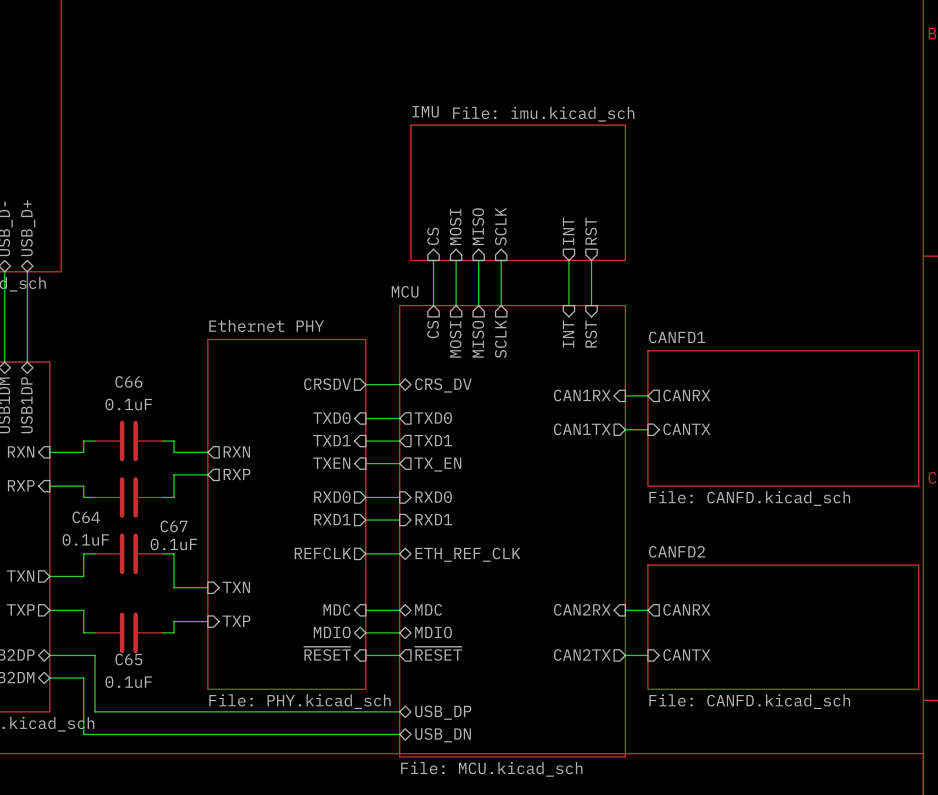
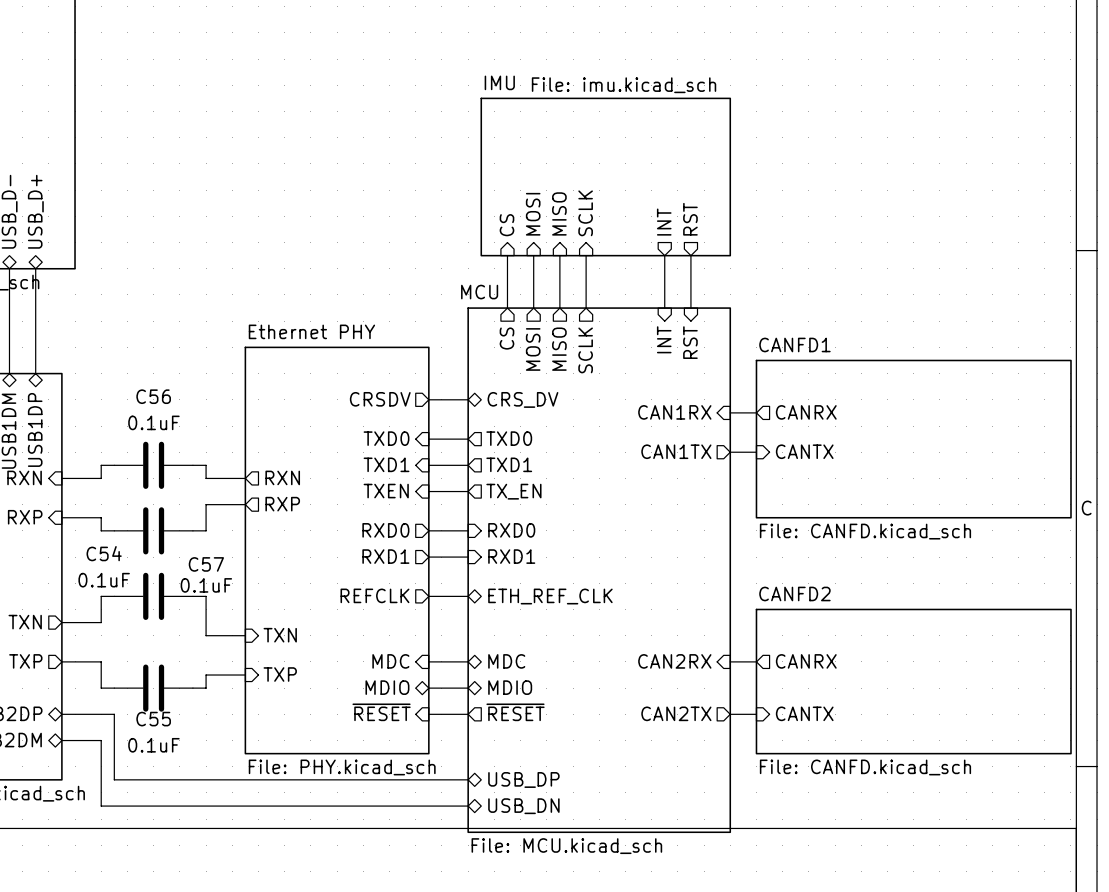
C66 name: C66 (128, 381) -> C56 (153, 396)
C64 name: C64 (86, 517) -> C54 (104, 553)
C67 name: C67 (174, 526) -> C57 (206, 564)
C65 name: C65 (128, 659) -> C55 (153, 719)

